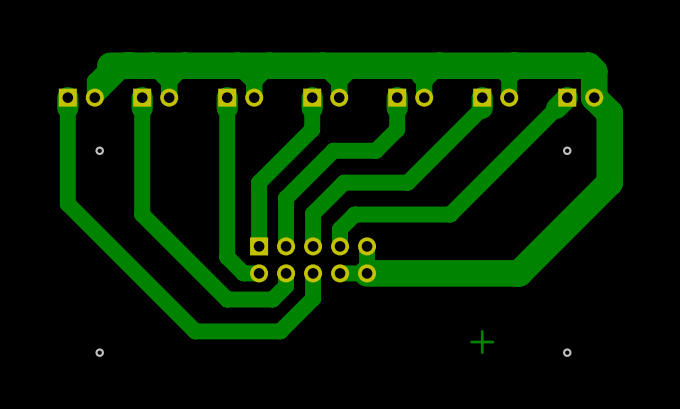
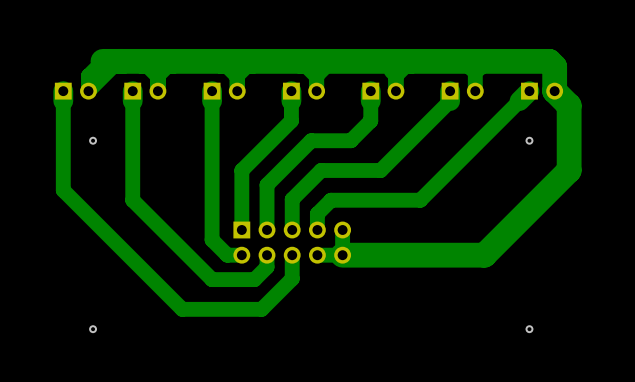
bottom track: (482, 331) (482, 352) -> none
bottom track: (492, 342) (471, 342) -> none

